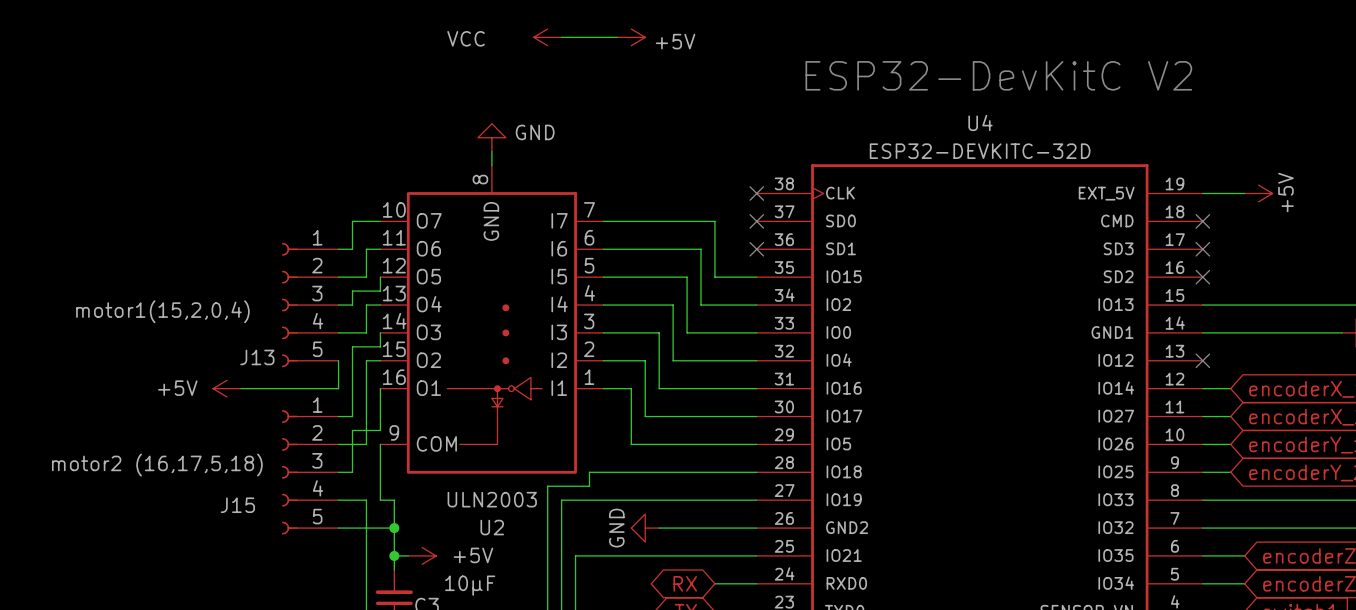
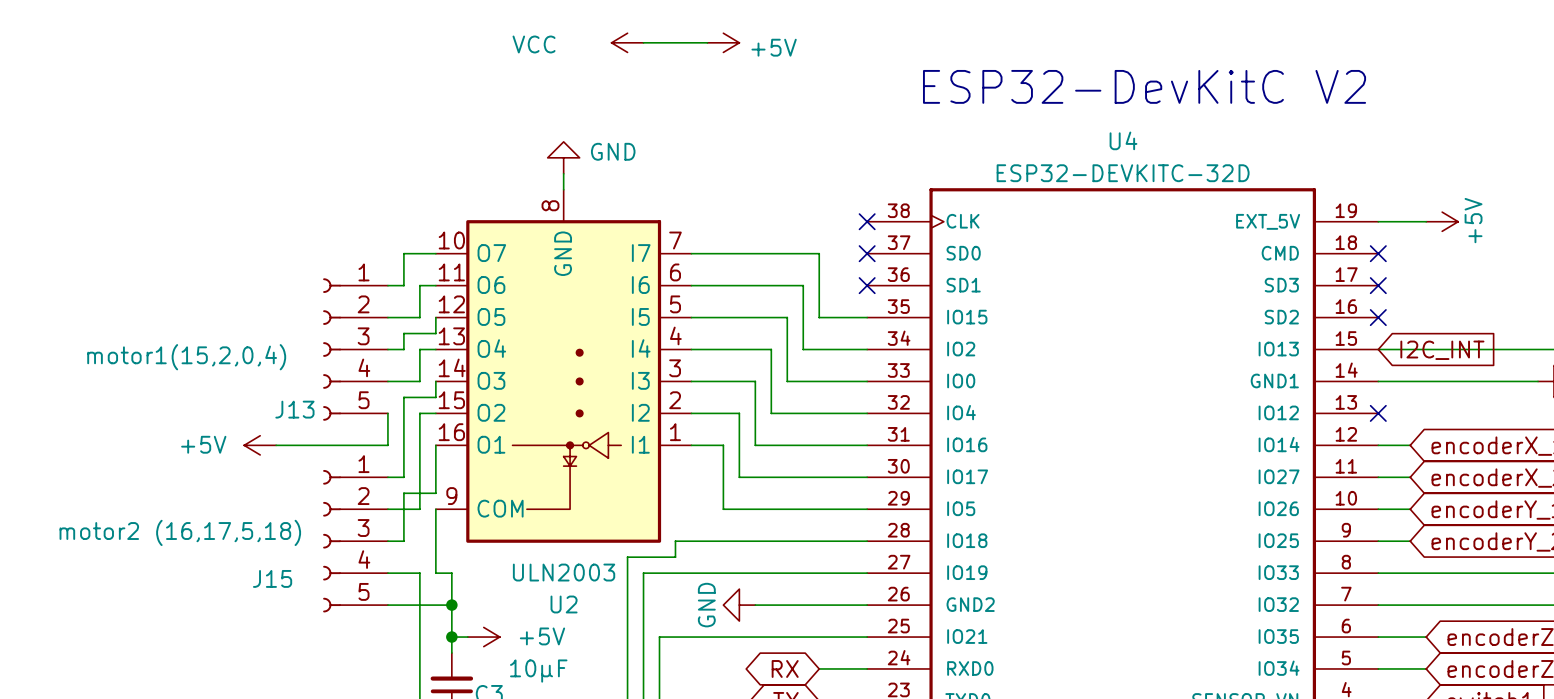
global label: none -> I2C_INT (1442, 350)

